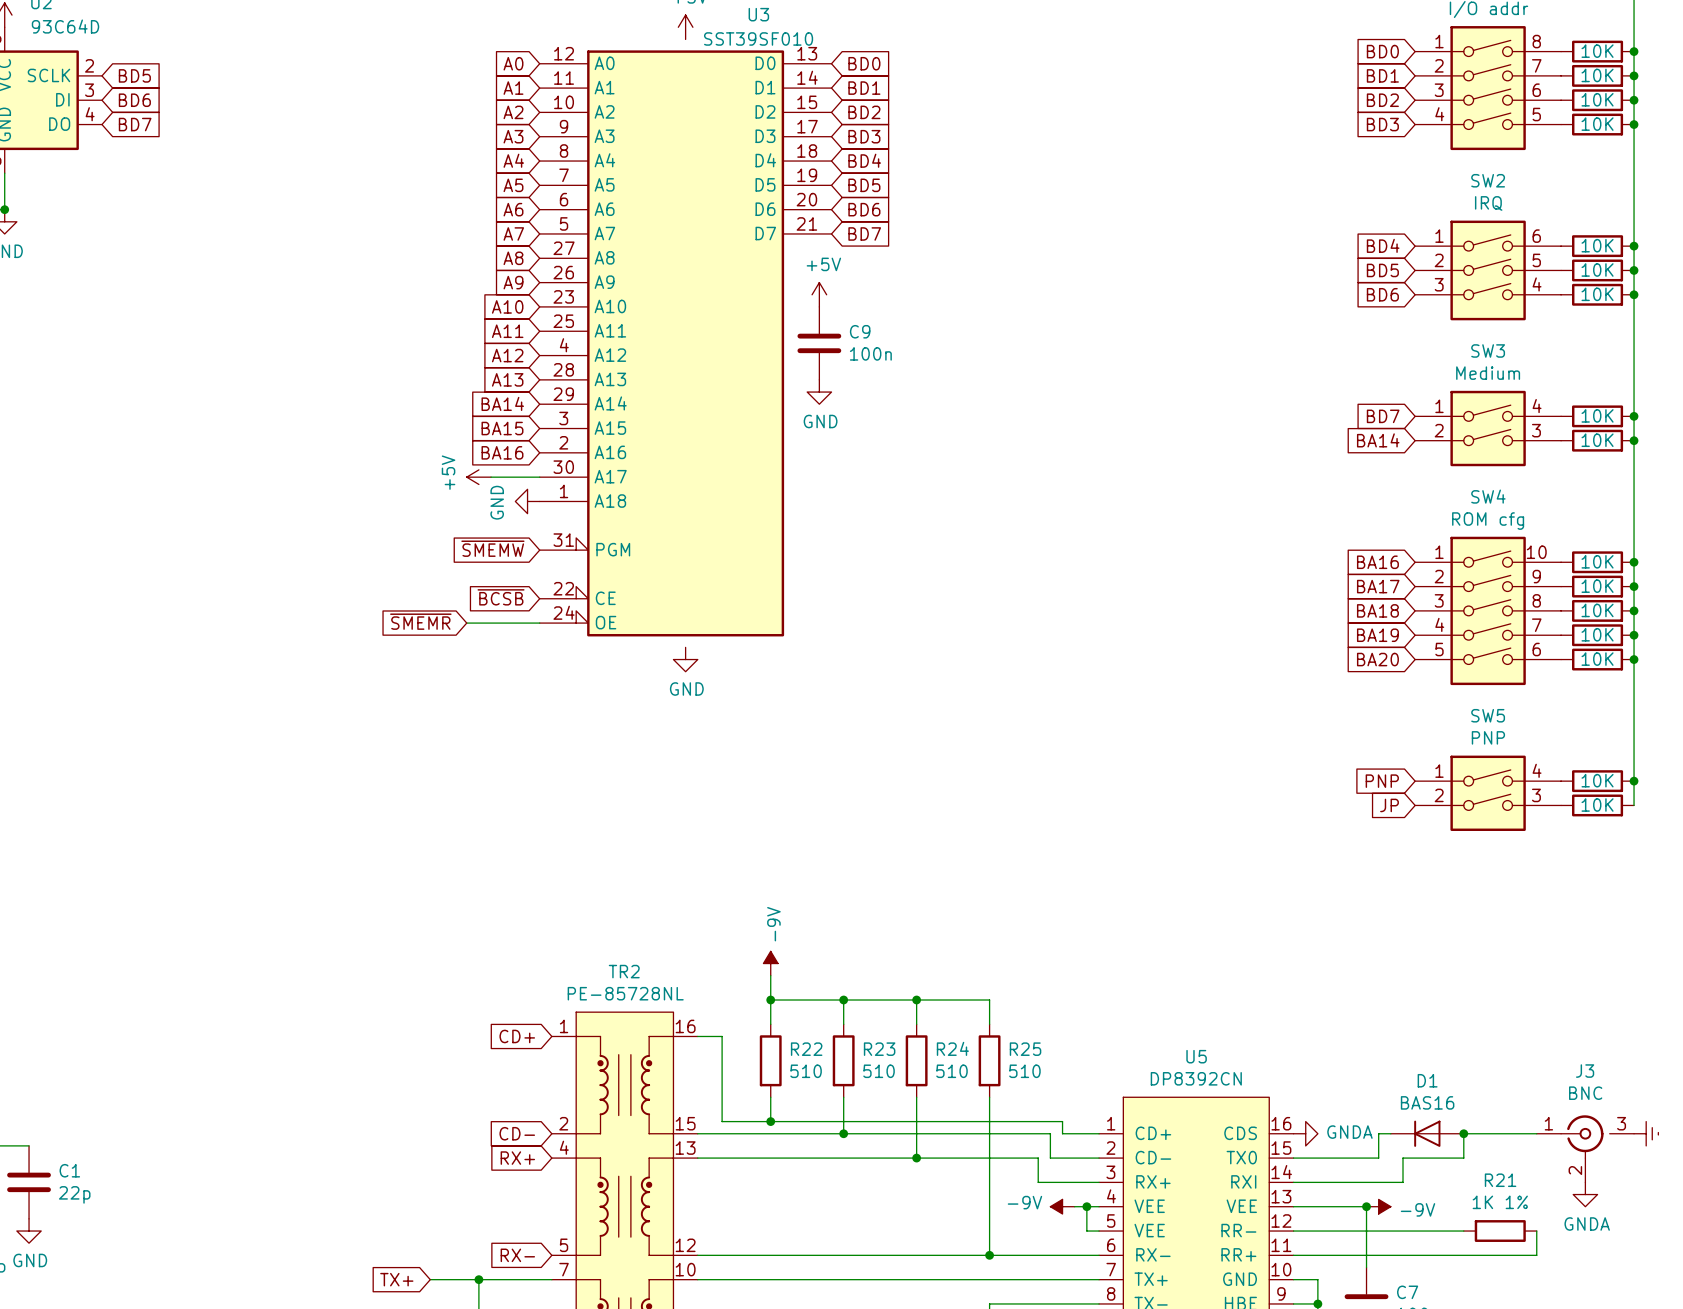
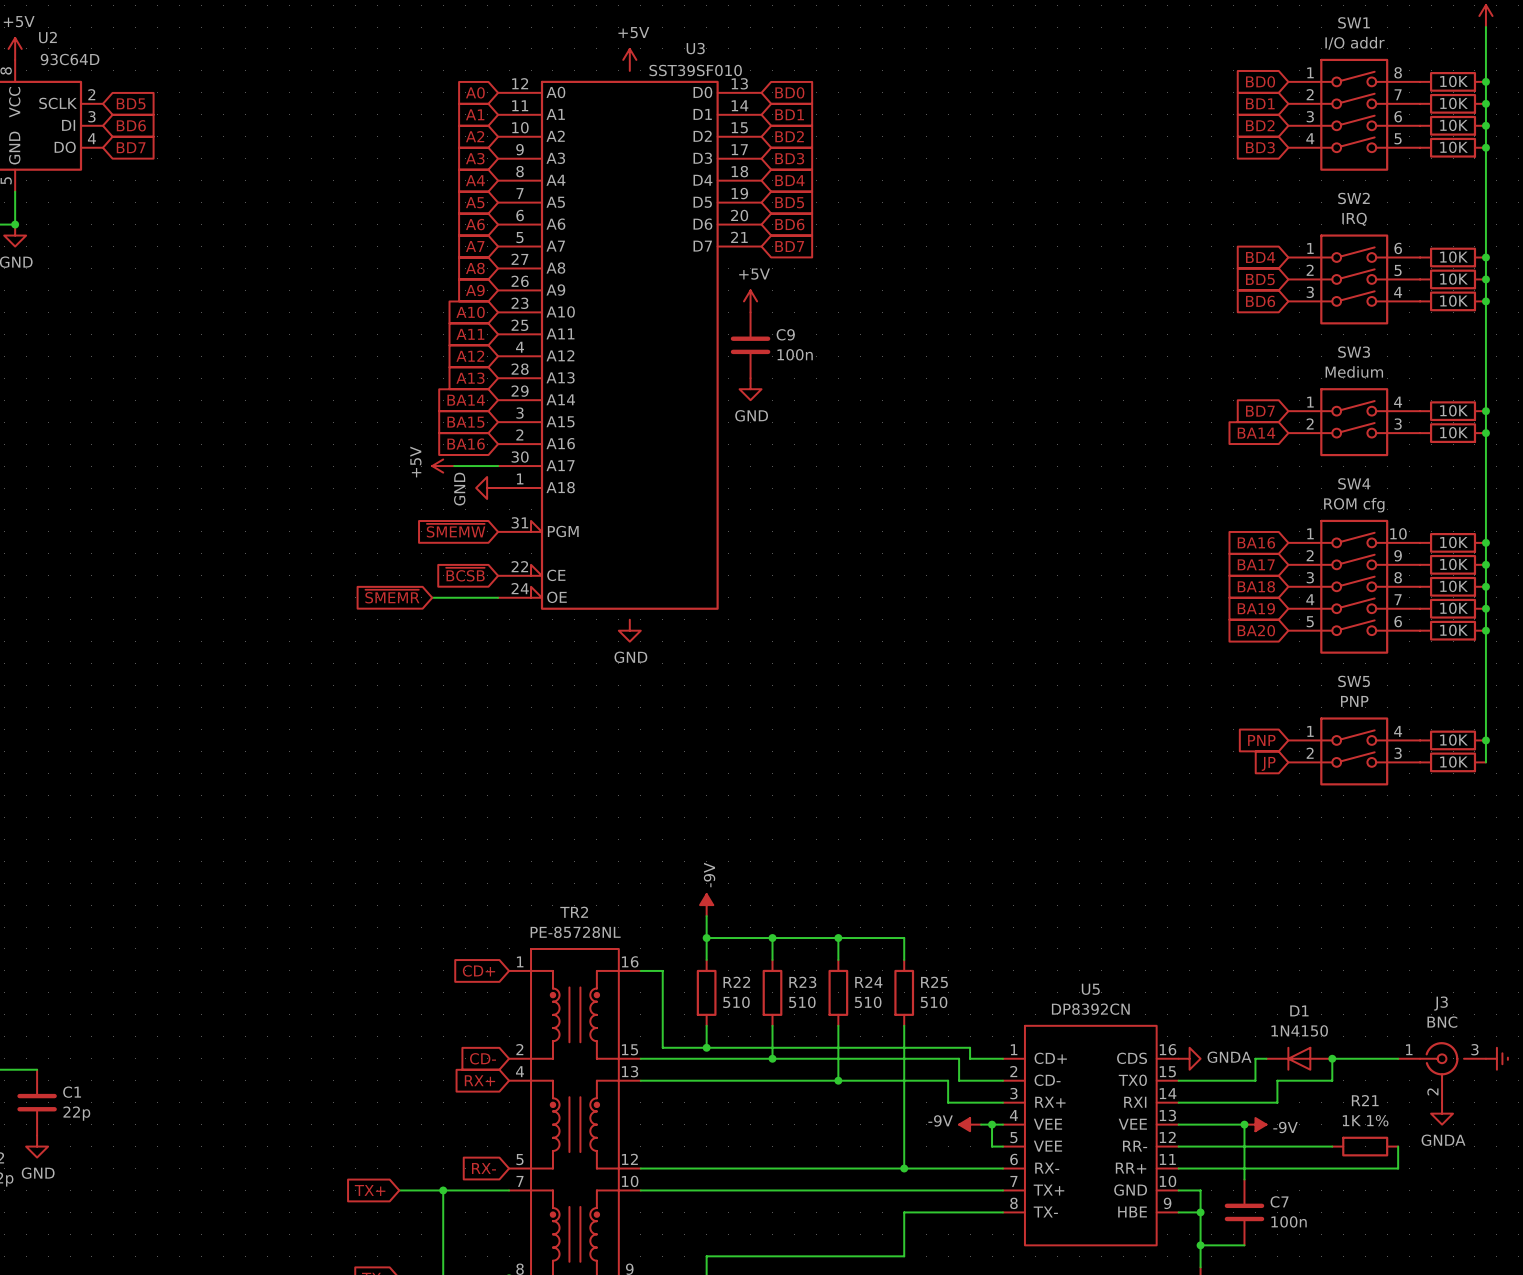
D1 value: BAS16 (1427, 1102) -> 1N4150 (1299, 1030)

